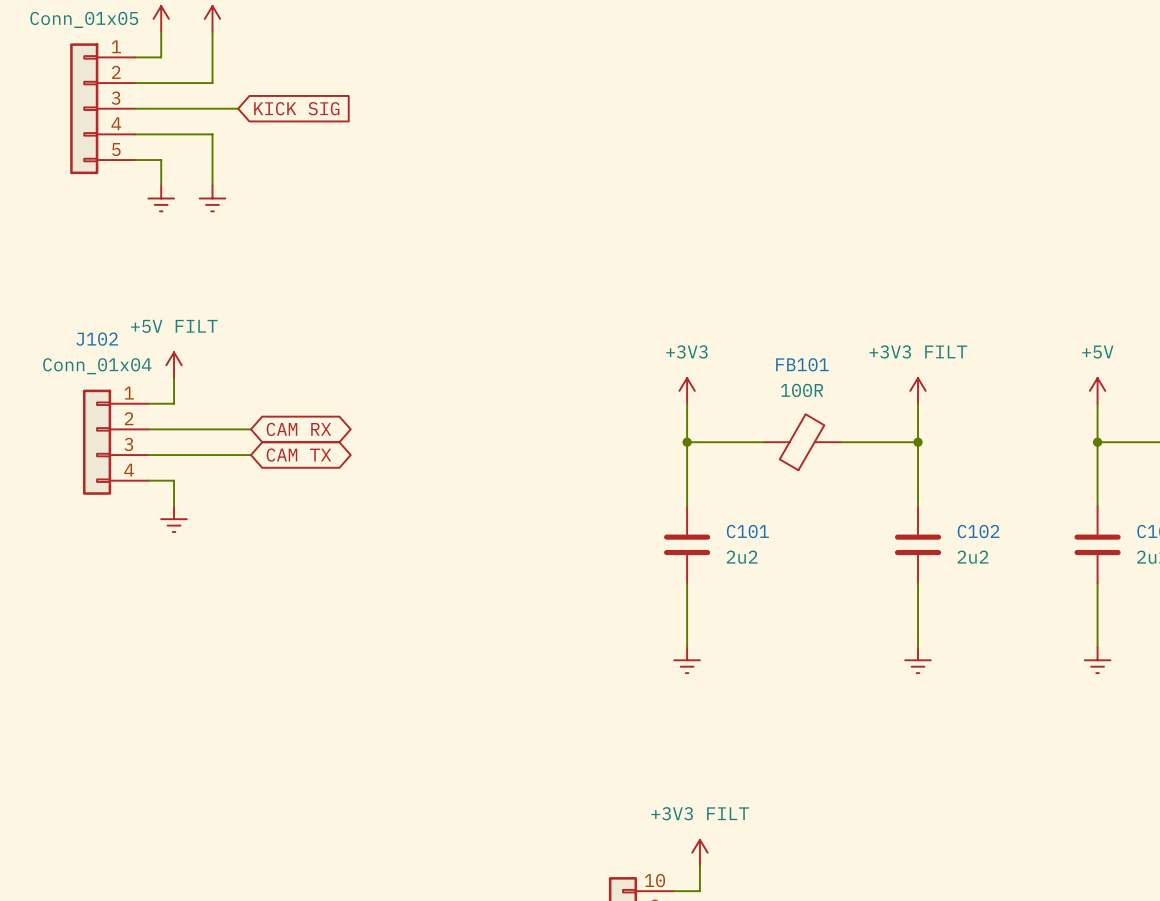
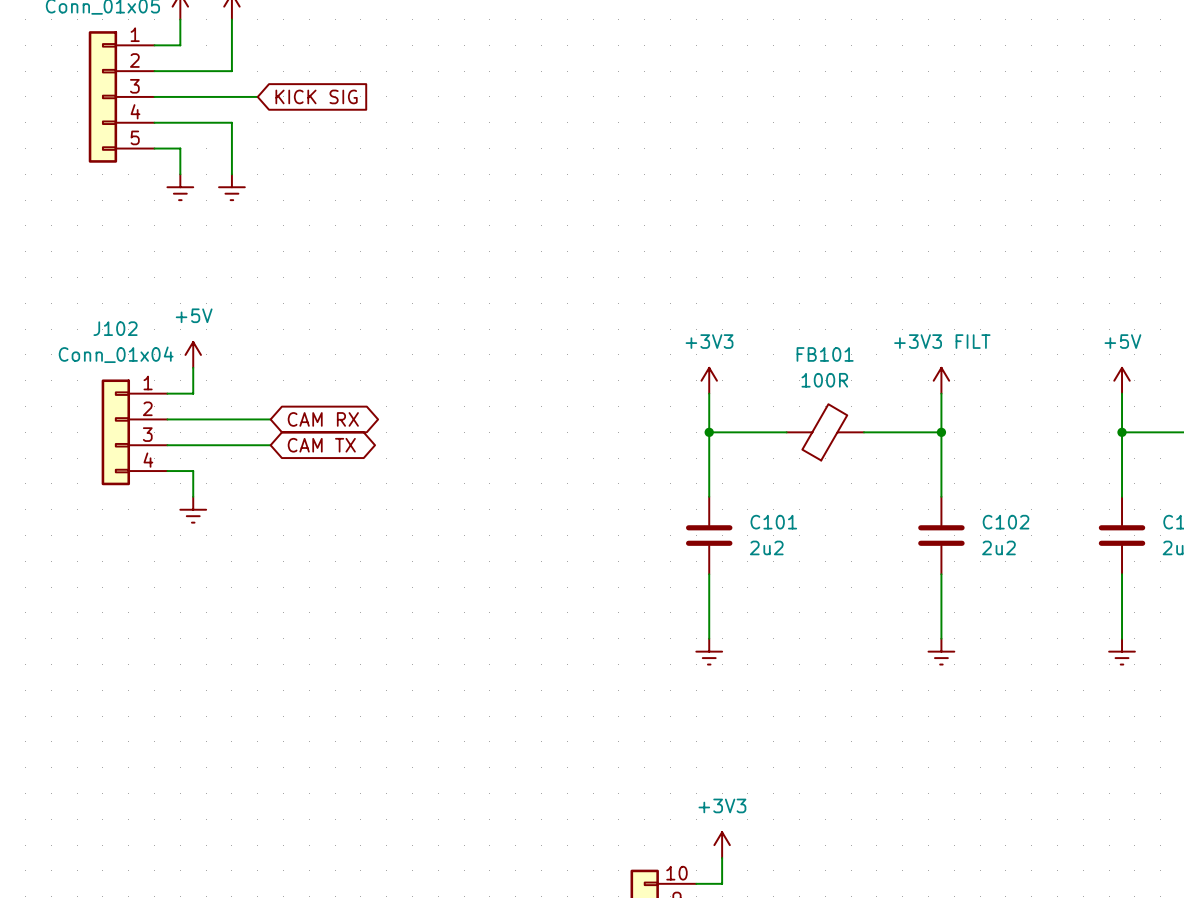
power symbol: +5V FILT (174, 365) -> +5V (193, 354)
power symbol: +3V3 FILT (699, 852) -> +3V3 (722, 845)

